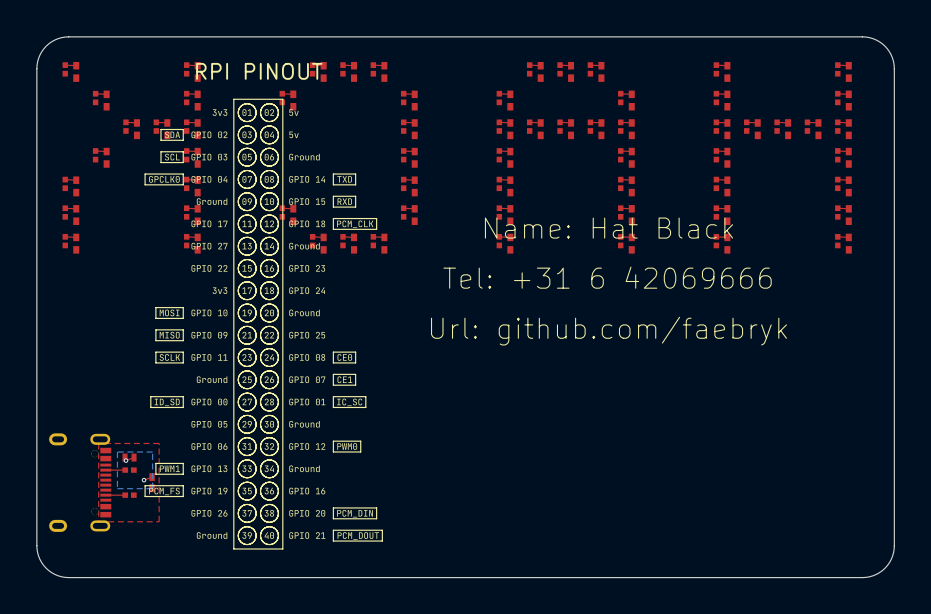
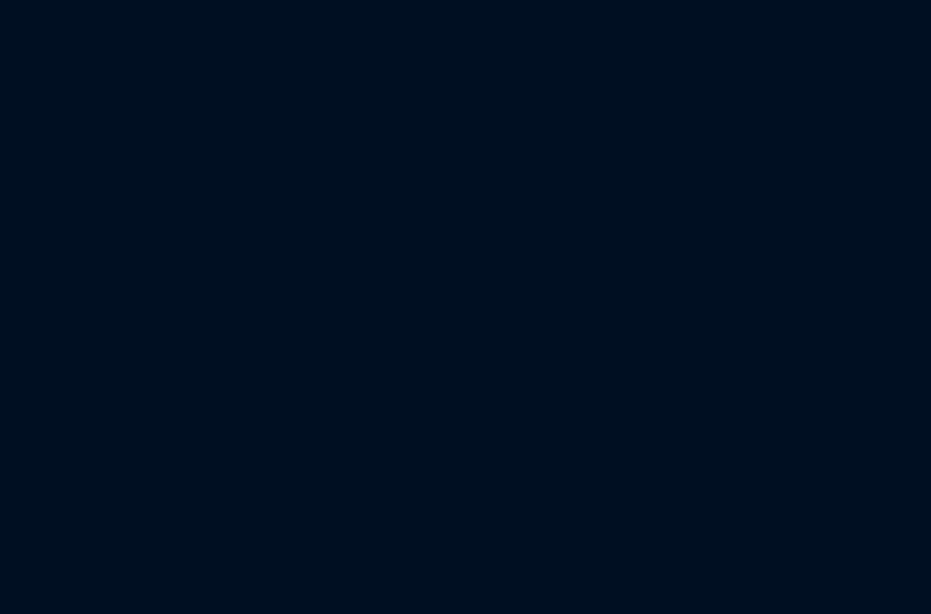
board edge: (862, 36) (68, 36) (51, 41) (40, 54) (36, 68) (36, 545) (41, 562) (54, 574) (68, 577) (862, 577) (879, 572) (889, 562) (894, 545) (894, 68) (892, 58) (885, 46) (876, 40) (862, 36) -> none
top track: (65, 65) (76, 65) -> none
top track: (186, 65) (197, 65) -> none
top track: (312, 65) (323, 65) -> none
top track: (342, 65) (354, 65) -> none
top track: (373, 65) (384, 65) -> none
top track: (529, 65) (540, 65) -> none
top track: (560, 65) (571, 65) -> none
top track: (590, 65) (601, 65) -> none
top track: (716, 65) (727, 65) -> none
top track: (837, 65) (848, 65) -> none
part: (65, 69) -> none
part: (186, 69) -> none
part: (312, 69) -> none
part: (342, 69) -> none
part: (373, 69) -> none
part: (529, 69) -> none
part: (560, 69) -> none
part: (590, 69) -> none
part: (716, 69) -> none
part: (837, 69) -> none
part: (76, 71) -> none
part: (197, 71) -> none
text: RPI PINOUT (259, 71) -> none
part: (323, 71) -> none
part: (354, 71) -> none
part: (384, 71) -> none
part: (540, 71) -> none
part: (571, 71) -> none
part: (601, 71) -> none
part: (727, 71) -> none
part: (848, 71) -> none
top track: (95, 93) (106, 94) -> none
top track: (186, 93) (197, 94) -> none
top track: (282, 93) (293, 94) -> none
top track: (403, 93) (414, 94) -> none
top track: (499, 93) (510, 94) -> none
top track: (620, 93) (631, 94) -> none
top track: (716, 93) (727, 94) -> none
top track: (837, 93) (848, 94) -> none
part: (95, 98) -> none
part: (186, 98) -> none
part: (282, 98) -> none
part: (403, 98) -> none
part: (499, 98) -> none
part: (620, 98) -> none
part: (716, 98) -> none
part: (837, 98) -> none
line: (282, 99) (233, 99) (233, 548) (282, 548) (282, 99) -> none
part: (106, 100) -> none
part: (197, 100) -> none
part: (293, 100) -> none
part: (414, 100) -> none
part: (510, 100) -> none
part: (631, 100) -> none
part: (727, 100) -> none
part: (848, 100) -> none
line: (248, 103) (241, 105) (238, 111) (240, 118) (246, 121) (252, 119) (256, 113) (254, 106) (248, 103) -> none
line: (270, 103) (263, 105) (260, 111) (262, 118) (268, 121) (275, 119) (278, 113) (276, 106) (270, 103) -> none
drawing: [212, 109, 228, 116] -> none
drawing: [242, 109, 252, 116] -> none
drawing: [264, 109, 275, 116] -> none
drawing: [289, 109, 299, 116] -> none
top track: (125, 122) (136, 122) -> none
top track: (156, 122) (167, 122) -> none
top track: (186, 122) (197, 122) -> none
top track: (403, 122) (414, 122) -> none
top track: (499, 122) (510, 122) -> none
top track: (529, 122) (540, 122) -> none
top track: (560, 122) (571, 122) -> none
top track: (590, 122) (601, 122) -> none
top track: (620, 122) (631, 122) -> none
top track: (716, 122) (727, 122) -> none
top track: (746, 122) (757, 122) -> none
top track: (777, 122) (788, 122) -> none
top track: (807, 122) (818, 122) -> none
top track: (837, 122) (848, 122) -> none
part: (125, 126) -> none
part: (156, 126) -> none
part: (186, 126) -> none
line: (248, 126) (241, 128) (238, 133) (240, 140) (246, 143) (252, 141) (256, 135) (254, 129) (248, 126) -> none
line: (270, 126) (263, 128) (260, 133) (262, 140) (268, 143) (275, 141) (278, 135) (276, 129) (270, 126) -> none
part: (403, 126) -> none
part: (499, 126) -> none
part: (529, 126) -> none
part: (560, 126) -> none
part: (590, 126) -> none
part: (620, 126) -> none
part: (716, 126) -> none
part: (746, 126) -> none
part: (777, 126) -> none
part: (807, 126) -> none
part: (837, 126) -> none
part: (136, 129) -> none
part: (167, 129) -> none
line: (183, 129) (183, 140) (160, 140) (160, 129) (183, 129) -> none
part: (197, 129) -> none
part: (414, 129) -> none
part: (510, 129) -> none
part: (540, 129) -> none
part: (571, 129) -> none
part: (601, 129) -> none
part: (631, 129) -> none
part: (727, 129) -> none
part: (757, 129) -> none
part: (788, 129) -> none
part: (818, 129) -> none
part: (848, 129) -> none
drawing: [165, 131, 228, 139] -> none
drawing: [242, 131, 252, 139] -> none
drawing: [264, 131, 274, 139] -> none
drawing: [289, 131, 299, 139] -> none
line: (248, 148) (241, 150) (238, 156) (240, 162) (246, 166) (252, 164) (256, 158) (254, 151) (248, 148) -> none
line: (270, 148) (263, 150) (260, 156) (262, 162) (268, 166) (275, 164) (278, 158) (276, 151) (270, 148) -> none
top track: (95, 150) (106, 151) -> none
top track: (186, 150) (197, 151) -> none
top track: (403, 150) (414, 151) -> none
top track: (499, 150) (510, 151) -> none
top track: (620, 150) (631, 151) -> none
top track: (716, 150) (727, 151) -> none
top track: (837, 150) (848, 151) -> none
line: (183, 151) (160, 151) (160, 162) (183, 162) (183, 151) -> none
drawing: [165, 153, 228, 161] -> none
drawing: [242, 153, 252, 161] -> none
drawing: [264, 153, 275, 161] -> none
drawing: [289, 153, 320, 161] -> none
part: (95, 155) -> none
part: (186, 155) -> none
part: (403, 155) -> none
part: (499, 155) -> none
part: (620, 155) -> none
part: (716, 155) -> none
part: (837, 155) -> none
part: (106, 157) -> none
part: (197, 157) -> none
part: (414, 157) -> none
part: (510, 157) -> none
part: (631, 157) -> none
part: (727, 157) -> none
part: (848, 157) -> none
line: (247, 170) (253, 173) (256, 179) (253, 186) (246, 188) (240, 185) (238, 178) (241, 172) (247, 170) -> none
line: (269, 170) (276, 173) (278, 179) (275, 186) (268, 188) (262, 185) (260, 178) (263, 172) (269, 170) -> none
line: (183, 174) (183, 184) (145, 184) (145, 174) (183, 174) -> none
line: (355, 174) (333, 174) (333, 184) (355, 184) (355, 174) -> none
drawing: [149, 176, 228, 183] -> none
drawing: [242, 176, 252, 183] -> none
drawing: [264, 176, 275, 183] -> none
drawing: [289, 176, 326, 183] -> none
drawing: [337, 176, 352, 183] -> none
top track: (65, 179) (76, 180) -> none
top track: (186, 179) (197, 180) -> none
top track: (403, 179) (414, 180) -> none
top track: (499, 179) (510, 180) -> none
top track: (620, 179) (631, 180) -> none
top track: (716, 179) (727, 180) -> none
top track: (837, 179) (848, 180) -> none
part: (65, 183) -> none
part: (186, 183) -> none
part: (403, 183) -> none
part: (499, 183) -> none
part: (620, 183) -> none
part: (716, 183) -> none
part: (837, 183) -> none
part: (76, 186) -> none
part: (197, 186) -> none
part: (414, 186) -> none
part: (510, 186) -> none
part: (631, 186) -> none
part: (727, 186) -> none
part: (848, 186) -> none
line: (248, 192) (241, 194) (238, 200) (240, 207) (246, 210) (252, 208) (256, 202) (254, 196) (248, 192) -> none
line: (270, 192) (263, 194) (260, 200) (262, 207) (268, 210) (275, 208) (278, 202) (276, 196) (270, 192) -> none
line: (355, 196) (355, 207) (333, 207) (333, 196) (355, 196) -> none
drawing: [196, 198, 228, 205] -> none
drawing: [242, 198, 252, 205] -> none
drawing: [264, 198, 275, 205] -> none
drawing: [289, 198, 326, 205] -> none
drawing: [337, 198, 352, 205] -> none
top track: (65, 208) (76, 208) -> none
top track: (186, 208) (197, 208) -> none
top track: (282, 208) (293, 208) -> none
top track: (403, 208) (414, 208) -> none
top track: (499, 208) (510, 208) -> none
top track: (620, 208) (631, 208) -> none
top track: (716, 208) (727, 208) -> none
top track: (837, 208) (848, 208) -> none
part: (65, 212) -> none
part: (186, 212) -> none
part: (282, 212) -> none
part: (403, 212) -> none
part: (499, 212) -> none
part: (620, 212) -> none
part: (716, 212) -> none
part: (837, 212) -> none
part: (76, 215) -> none
part: (197, 215) -> none
line: (248, 215) (241, 217) (238, 223) (240, 229) (246, 232) (252, 230) (256, 224) (254, 218) (248, 215) -> none
line: (270, 215) (263, 217) (260, 223) (262, 229) (268, 232) (275, 230) (278, 224) (276, 218) (270, 215) -> none
part: (293, 215) -> none
part: (414, 215) -> none
part: (510, 215) -> none
part: (631, 215) -> none
part: (727, 215) -> none
part: (848, 215) -> none
line: (376, 218) (376, 229) (333, 229) (333, 218) (376, 218) -> none
drawing: [191, 220, 228, 228] -> none
drawing: [242, 220, 252, 228] -> none
drawing: [264, 220, 275, 228] -> none
drawing: [289, 220, 374, 229] -> none
text: Name: Hat Black (608, 228) -> none
top track: (65, 236) (76, 237) -> none
top track: (186, 236) (197, 237) -> none
top track: (312, 236) (323, 237) -> none
top track: (342, 236) (354, 237) -> none
top track: (373, 236) (384, 237) -> none
top track: (499, 236) (510, 237) -> none
top track: (620, 236) (631, 237) -> none
top track: (716, 236) (727, 237) -> none
top track: (837, 236) (848, 237) -> none
line: (248, 237) (241, 239) (238, 245) (240, 251) (246, 255) (252, 253) (256, 247) (254, 240) (248, 237) -> none
line: (270, 237) (263, 239) (260, 245) (262, 251) (268, 255) (275, 253) (278, 247) (276, 240) (270, 237) -> none
part: (65, 241) -> none
part: (186, 241) -> none
part: (312, 241) -> none
part: (342, 241) -> none
part: (373, 241) -> none
part: (499, 241) -> none
part: (620, 241) -> none
part: (716, 241) -> none
part: (837, 241) -> none
drawing: [191, 242, 228, 250] -> none
drawing: [242, 242, 252, 250] -> none
drawing: [264, 242, 274, 250] -> none
drawing: [289, 242, 320, 250] -> none
part: (76, 243) -> none
part: (197, 243) -> none
part: (323, 243) -> none
part: (354, 243) -> none
part: (384, 243) -> none
part: (510, 243) -> none
part: (631, 243) -> none
part: (727, 243) -> none
part: (848, 243) -> none
line: (247, 259) (253, 262) (256, 268) (253, 275) (246, 277) (240, 274) (238, 268) (241, 261) (247, 259) -> none
line: (269, 259) (276, 262) (278, 268) (275, 275) (268, 277) (262, 274) (260, 268) (263, 261) (269, 259) -> none
drawing: [191, 265, 228, 272] -> none
drawing: [242, 265, 252, 272] -> none
drawing: [264, 265, 275, 272] -> none
drawing: [289, 265, 326, 272] -> none
text: Tel: +31 6 42069666 (607, 277) -> none
line: (248, 281) (241, 283) (238, 289) (240, 296) (246, 299) (252, 297) (256, 291) (254, 285) (248, 281) -> none
line: (270, 281) (263, 283) (260, 289) (262, 296) (268, 299) (275, 297) (278, 291) (276, 285) (270, 281) -> none
drawing: [212, 287, 228, 295] -> none
drawing: [242, 287, 252, 294] -> none
drawing: [264, 287, 275, 295] -> none
drawing: [289, 287, 326, 295] -> none
line: (248, 304) (241, 306) (238, 312) (240, 318) (246, 321) (252, 319) (256, 313) (254, 307) (248, 304) -> none
line: (270, 304) (263, 306) (260, 312) (262, 318) (268, 321) (275, 319) (278, 313) (276, 307) (270, 304) -> none
line: (183, 307) (183, 318) (155, 318) (155, 307) (183, 307) -> none
drawing: [159, 309, 180, 317] -> none
drawing: [191, 309, 228, 317] -> none
drawing: [242, 309, 252, 317] -> none
drawing: [264, 309, 275, 317] -> none
drawing: [289, 309, 320, 317] -> none
line: (248, 326) (241, 328) (238, 334) (240, 340) (246, 344) (252, 342) (256, 336) (254, 329) (248, 326) -> none
line: (270, 326) (263, 328) (260, 334) (262, 340) (268, 344) (275, 342) (278, 336) (276, 329) (270, 326) -> none
line: (183, 329) (183, 340) (155, 340) (155, 329) (183, 329) -> none
drawing: [159, 331, 228, 339] -> none
drawing: [242, 331, 252, 339] -> none
drawing: [264, 331, 275, 339] -> none
drawing: [289, 331, 326, 339] -> none
text: Url: github.com/faebryk (608, 331) -> none
line: (247, 348) (253, 351) (256, 357) (253, 364) (246, 366) (240, 363) (238, 357) (241, 350) (247, 348) -> none
line: (269, 348) (276, 351) (278, 357) (275, 364) (268, 366) (262, 363) (260, 357) (263, 350) (269, 348) -> none
line: (183, 352) (183, 362) (155, 362) (155, 352) (183, 352) -> none
line: (355, 352) (333, 352) (333, 362) (355, 362) (355, 352) -> none
drawing: [159, 354, 228, 361] -> none
drawing: [242, 354, 252, 361] -> none
drawing: [264, 354, 274, 361] -> none
drawing: [289, 354, 326, 361] -> none
drawing: [337, 354, 353, 361] -> none
line: (248, 370) (241, 372) (238, 378) (240, 385) (246, 388) (252, 386) (256, 380) (254, 374) (248, 370) -> none
line: (270, 370) (263, 372) (260, 378) (262, 385) (268, 388) (275, 386) (278, 380) (276, 374) (270, 370) -> none
line: (355, 374) (355, 385) (333, 385) (333, 374) (355, 374) -> none
drawing: [196, 376, 228, 384] -> none
drawing: [242, 376, 252, 384] -> none
drawing: [264, 376, 275, 384] -> none
drawing: [289, 376, 326, 384] -> none
drawing: [337, 376, 353, 384] -> none
line: (248, 393) (241, 395) (238, 401) (240, 407) (246, 410) (252, 408) (256, 402) (254, 396) (248, 393) -> none
line: (270, 393) (263, 395) (260, 401) (262, 407) (268, 410) (275, 408) (278, 402) (276, 396) (270, 393) -> none
line: (183, 396) (183, 407) (150, 407) (150, 396) (183, 396) -> none
line: (365, 396) (333, 396) (333, 407) (365, 407) (365, 396) -> none
drawing: [154, 398, 228, 407] -> none
drawing: [242, 398, 252, 406] -> none
drawing: [264, 398, 275, 406] -> none
drawing: [289, 398, 363, 407] -> none
line: (248, 415) (241, 417) (238, 423) (240, 429) (246, 433) (252, 431) (256, 425) (254, 418) (248, 415) -> none
line: (270, 415) (263, 417) (260, 423) (262, 429) (268, 433) (275, 431) (278, 425) (276, 418) (270, 415) -> none
drawing: [191, 420, 228, 428] -> none
drawing: [242, 420, 252, 428] -> none
drawing: [264, 420, 275, 428] -> none
drawing: [289, 420, 320, 428] -> none
line: (247, 437) (253, 440) (256, 447) (253, 453) (246, 455) (240, 452) (238, 446) (241, 439) (247, 437) -> none
line: (269, 437) (276, 440) (278, 447) (275, 453) (268, 455) (262, 452) (260, 446) (263, 439) (269, 437) -> none
line: (360, 441) (333, 441) (333, 451) (360, 451) (360, 441) -> none
top zone outline: (159, 443) (98, 443) (98, 521) (159, 521) (159, 443) -> none
drawing: [191, 443, 228, 450] -> none
drawing: [242, 443, 252, 450] -> none
drawing: [264, 443, 275, 450] -> none
drawing: [289, 443, 326, 450] -> none
drawing: [337, 443, 358, 450] -> none
bottom zone outline: (152, 452) (117, 452) (117, 488) (152, 488) (152, 452) -> none
part: (129, 457) -> none
top track: (134, 457) (126, 460) -> none
line: (248, 459) (241, 461) (238, 467) (240, 474) (246, 477) (252, 475) (256, 469) (254, 463) (248, 459) -> none
line: (270, 459) (263, 461) (260, 467) (262, 474) (268, 477) (275, 475) (278, 469) (276, 463) (270, 459) -> none
via: (126, 460) -> none
line: (183, 463) (183, 474) (155, 474) (155, 463) (183, 463) -> none
drawing: [159, 465, 228, 473] -> none
drawing: [242, 465, 252, 473] -> none
drawing: [264, 465, 274, 473] -> none
drawing: [289, 465, 320, 473] -> none
top track: (125, 470) (105, 470) -> none
part: (129, 470) -> none
top track: (152, 477) (144, 480) -> none
via: (144, 480) -> none
part: (80, 482) -> none
part: (152, 482) -> none
line: (248, 482) (241, 484) (238, 490) (240, 496) (246, 499) (252, 497) (256, 492) (254, 485) (248, 482) -> none
line: (270, 482) (263, 484) (260, 490) (262, 496) (268, 499) (275, 497) (278, 492) (276, 485) (270, 482) -> none
line: (183, 485) (183, 496) (145, 496) (145, 485) (183, 485) -> none
drawing: [149, 487, 228, 496] -> none
drawing: [242, 487, 252, 495] -> none
drawing: [264, 487, 275, 495] -> none
drawing: [289, 487, 326, 495] -> none
top track: (125, 495) (105, 495) -> none
part: (129, 495) -> none
line: (248, 504) (241, 506) (238, 512) (240, 519) (246, 522) (252, 520) (256, 514) (254, 507) (248, 504) -> none
line: (270, 504) (263, 506) (260, 512) (262, 519) (268, 522) (275, 520) (278, 514) (276, 507) (270, 504) -> none
line: (376, 507) (333, 507) (333, 518) (376, 518) (376, 507) -> none
drawing: [191, 509, 228, 517] -> none
drawing: [264, 509, 275, 517] -> none
drawing: [289, 509, 373, 518] -> none
drawing: [242, 510, 252, 517] -> none
line: (247, 526) (253, 529) (256, 536) (253, 542) (246, 544) (240, 541) (238, 535) (241, 529) (247, 526) -> none
line: (269, 526) (276, 529) (278, 536) (275, 542) (268, 544) (262, 541) (260, 535) (263, 529) (269, 526) -> none
line: (382, 530) (333, 530) (333, 541) (382, 541) (382, 530) -> none
drawing: [196, 532, 228, 539] -> none
drawing: [242, 532, 252, 539] -> none
drawing: [264, 532, 275, 539] -> none
drawing: [289, 532, 326, 539] -> none
drawing: [337, 532, 380, 540] -> none

